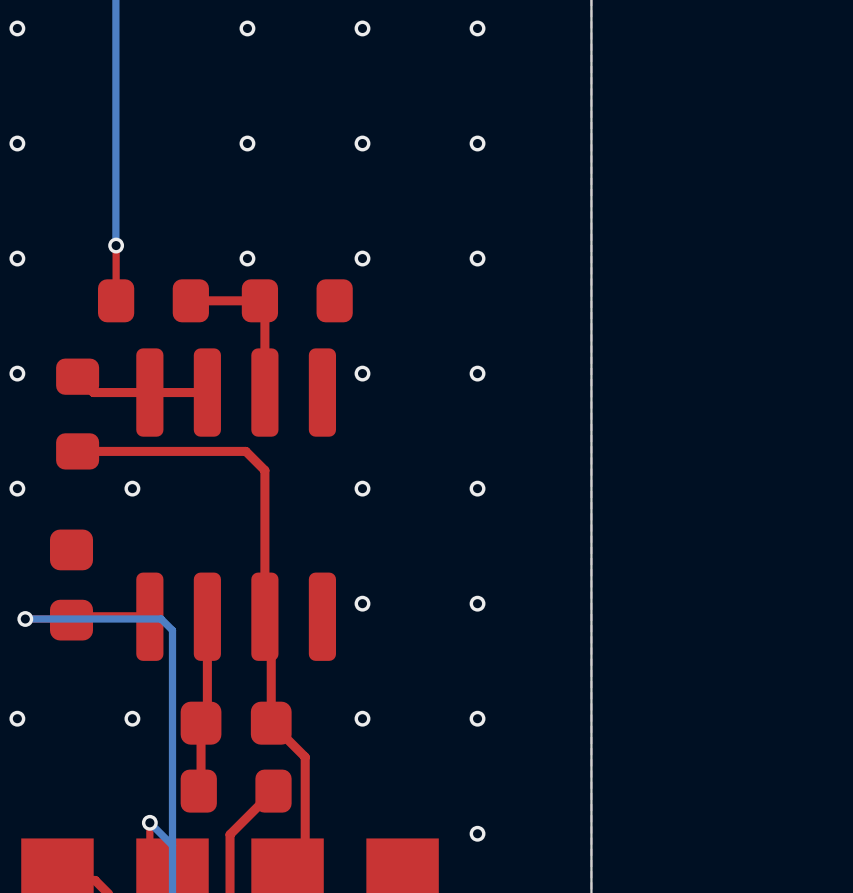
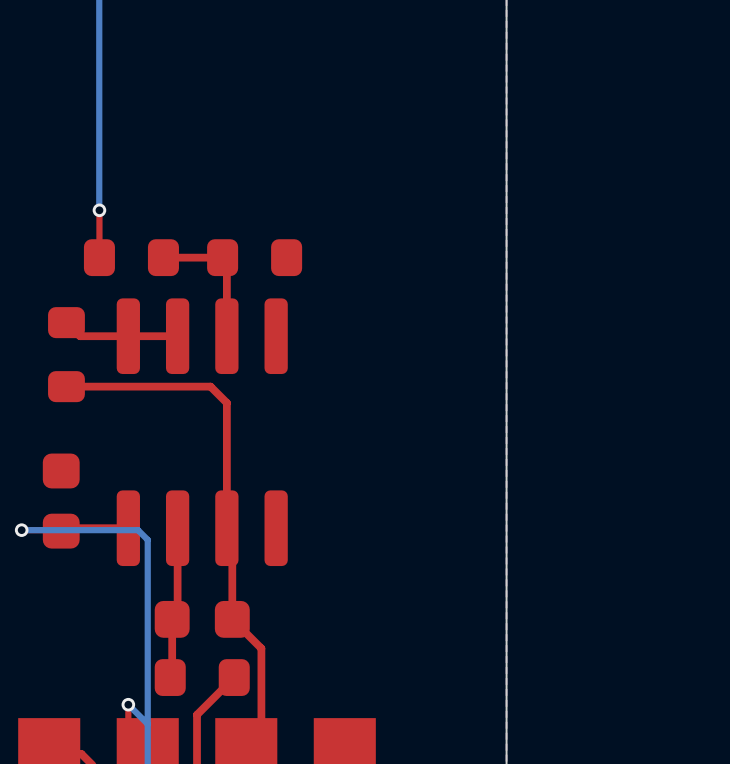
via: (17, 28) -> none
via: (247, 28) -> none
via: (362, 28) -> none
via: (477, 28) -> none
via: (17, 143) -> none
via: (247, 143) -> none
via: (362, 143) -> none
via: (477, 143) -> none
via: (17, 258) -> none
via: (247, 258) -> none
via: (362, 258) -> none
via: (477, 258) -> none
via: (17, 373) -> none
via: (362, 373) -> none
via: (477, 373) -> none
via: (17, 488) -> none
via: (132, 488) -> none
via: (362, 488) -> none
via: (477, 488) -> none
via: (362, 603) -> none
via: (477, 603) -> none
via: (17, 718) -> none
via: (132, 718) -> none
via: (362, 718) -> none
via: (477, 718) -> none
via: (477, 833) -> none

